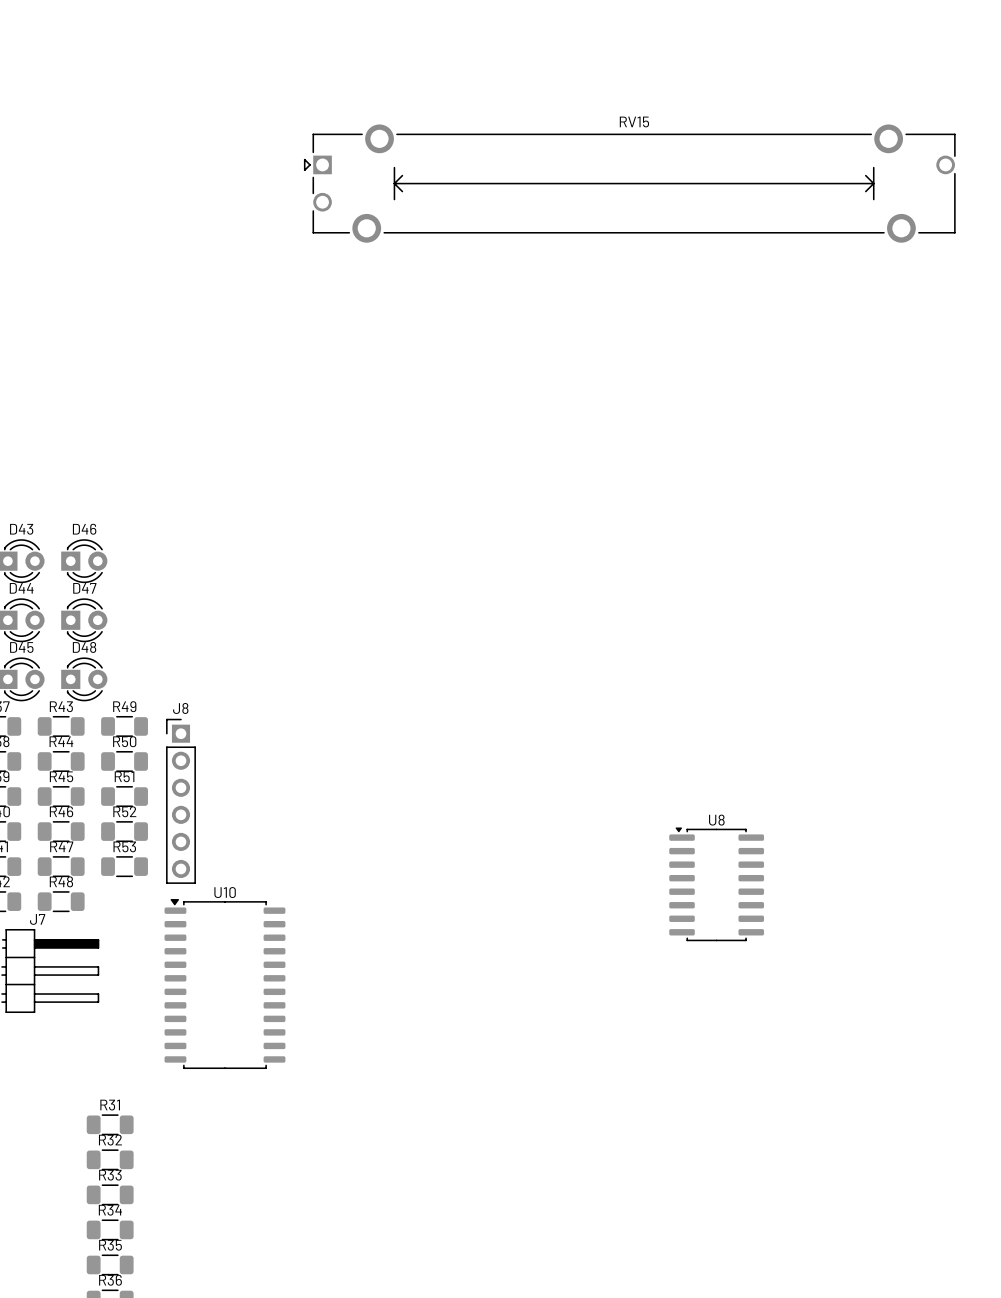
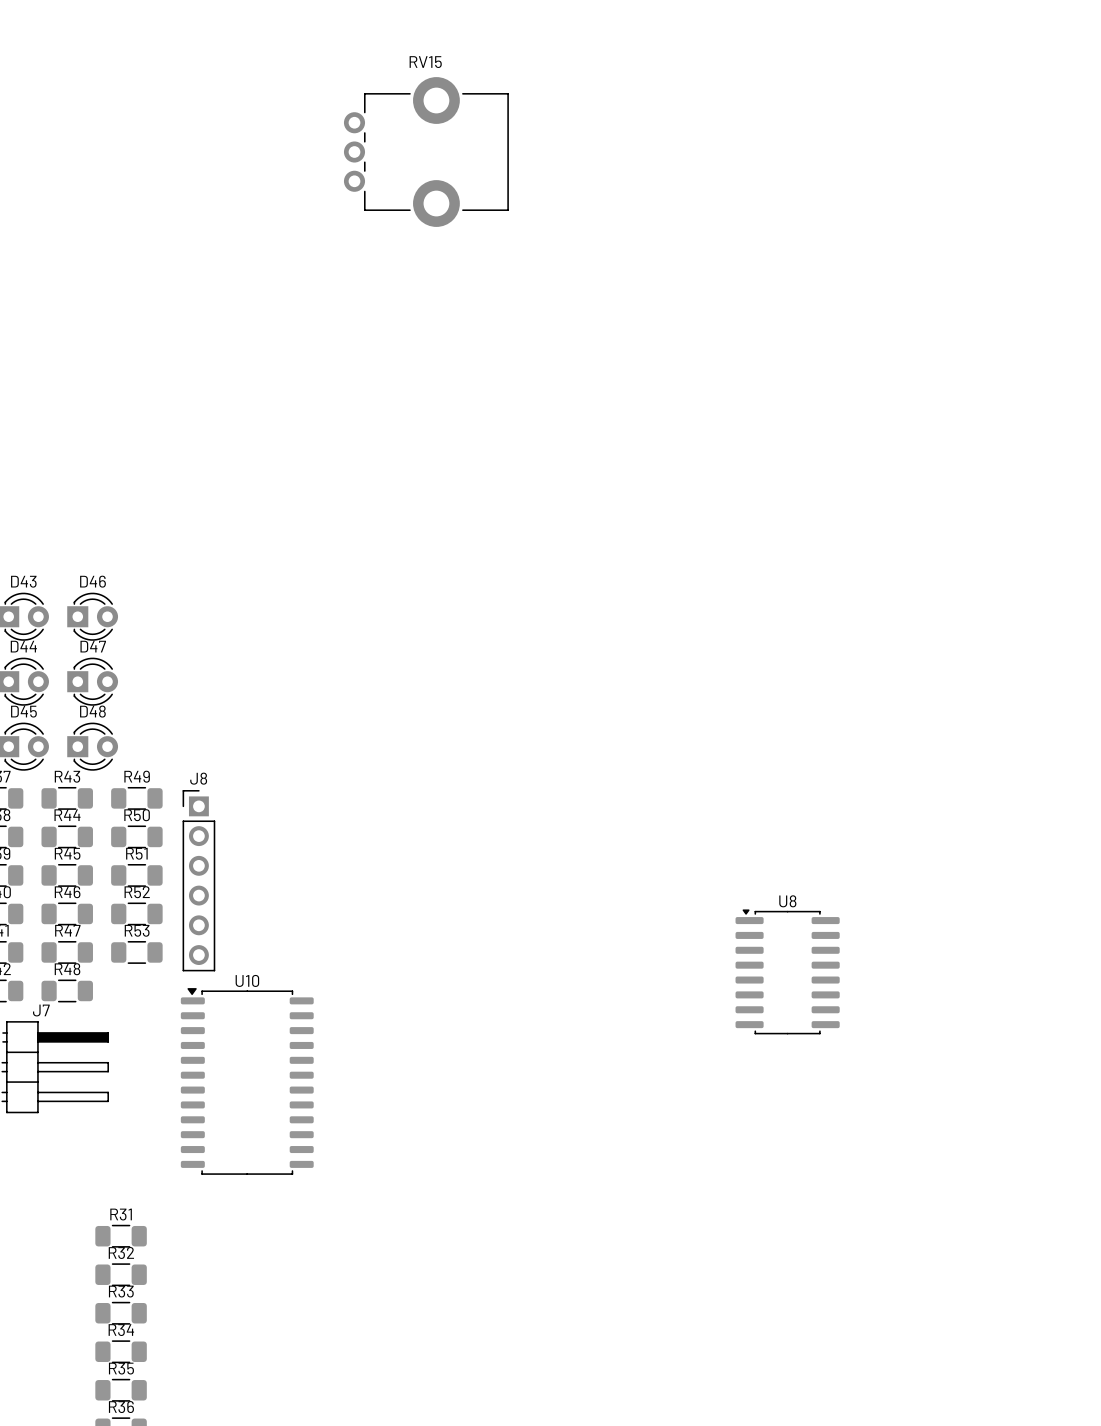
RV15 footprint: [304, 124, 956, 243] -> [343, 77, 509, 227]

